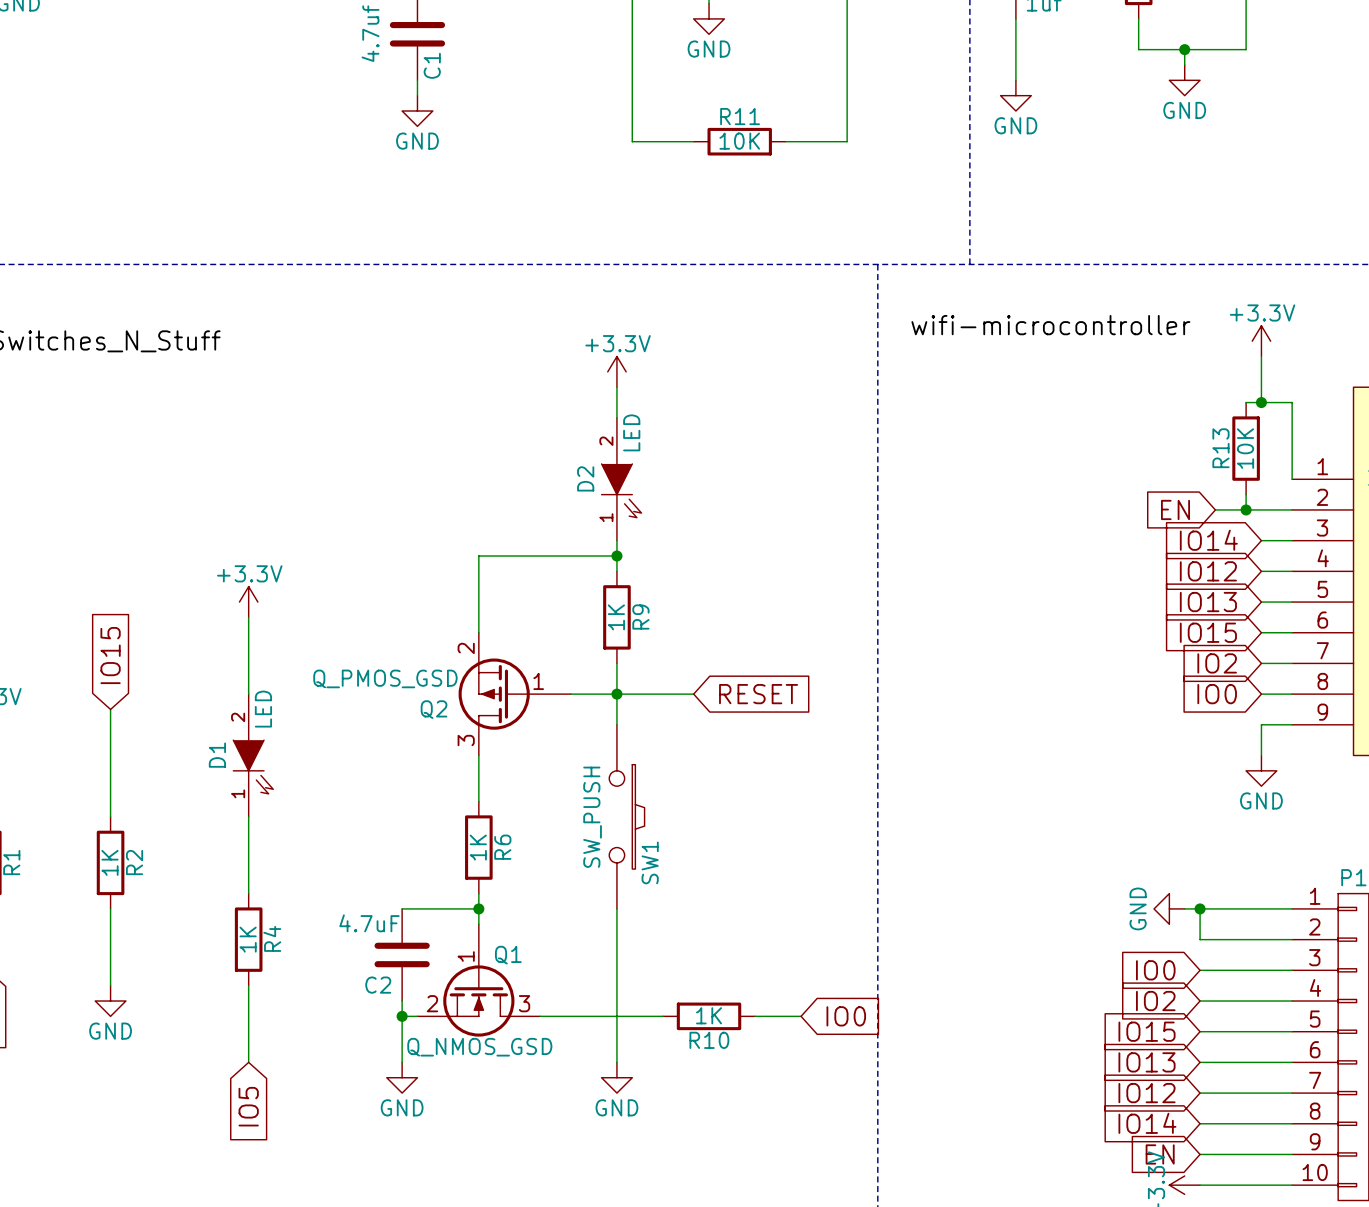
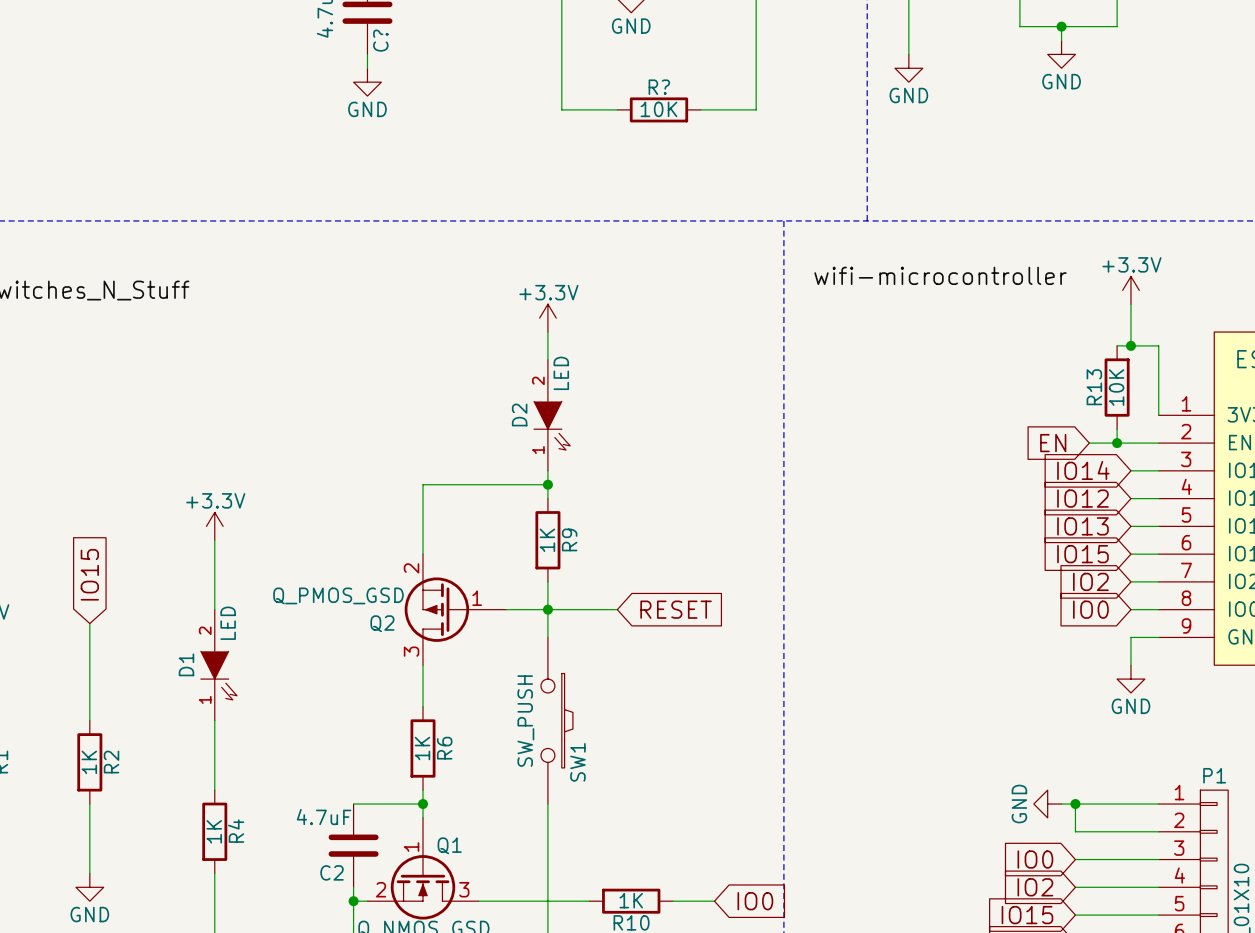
C1 name: C1 (432, 65) -> C? (380, 40)
R11 name: R11 (740, 116) -> R? (659, 87)

